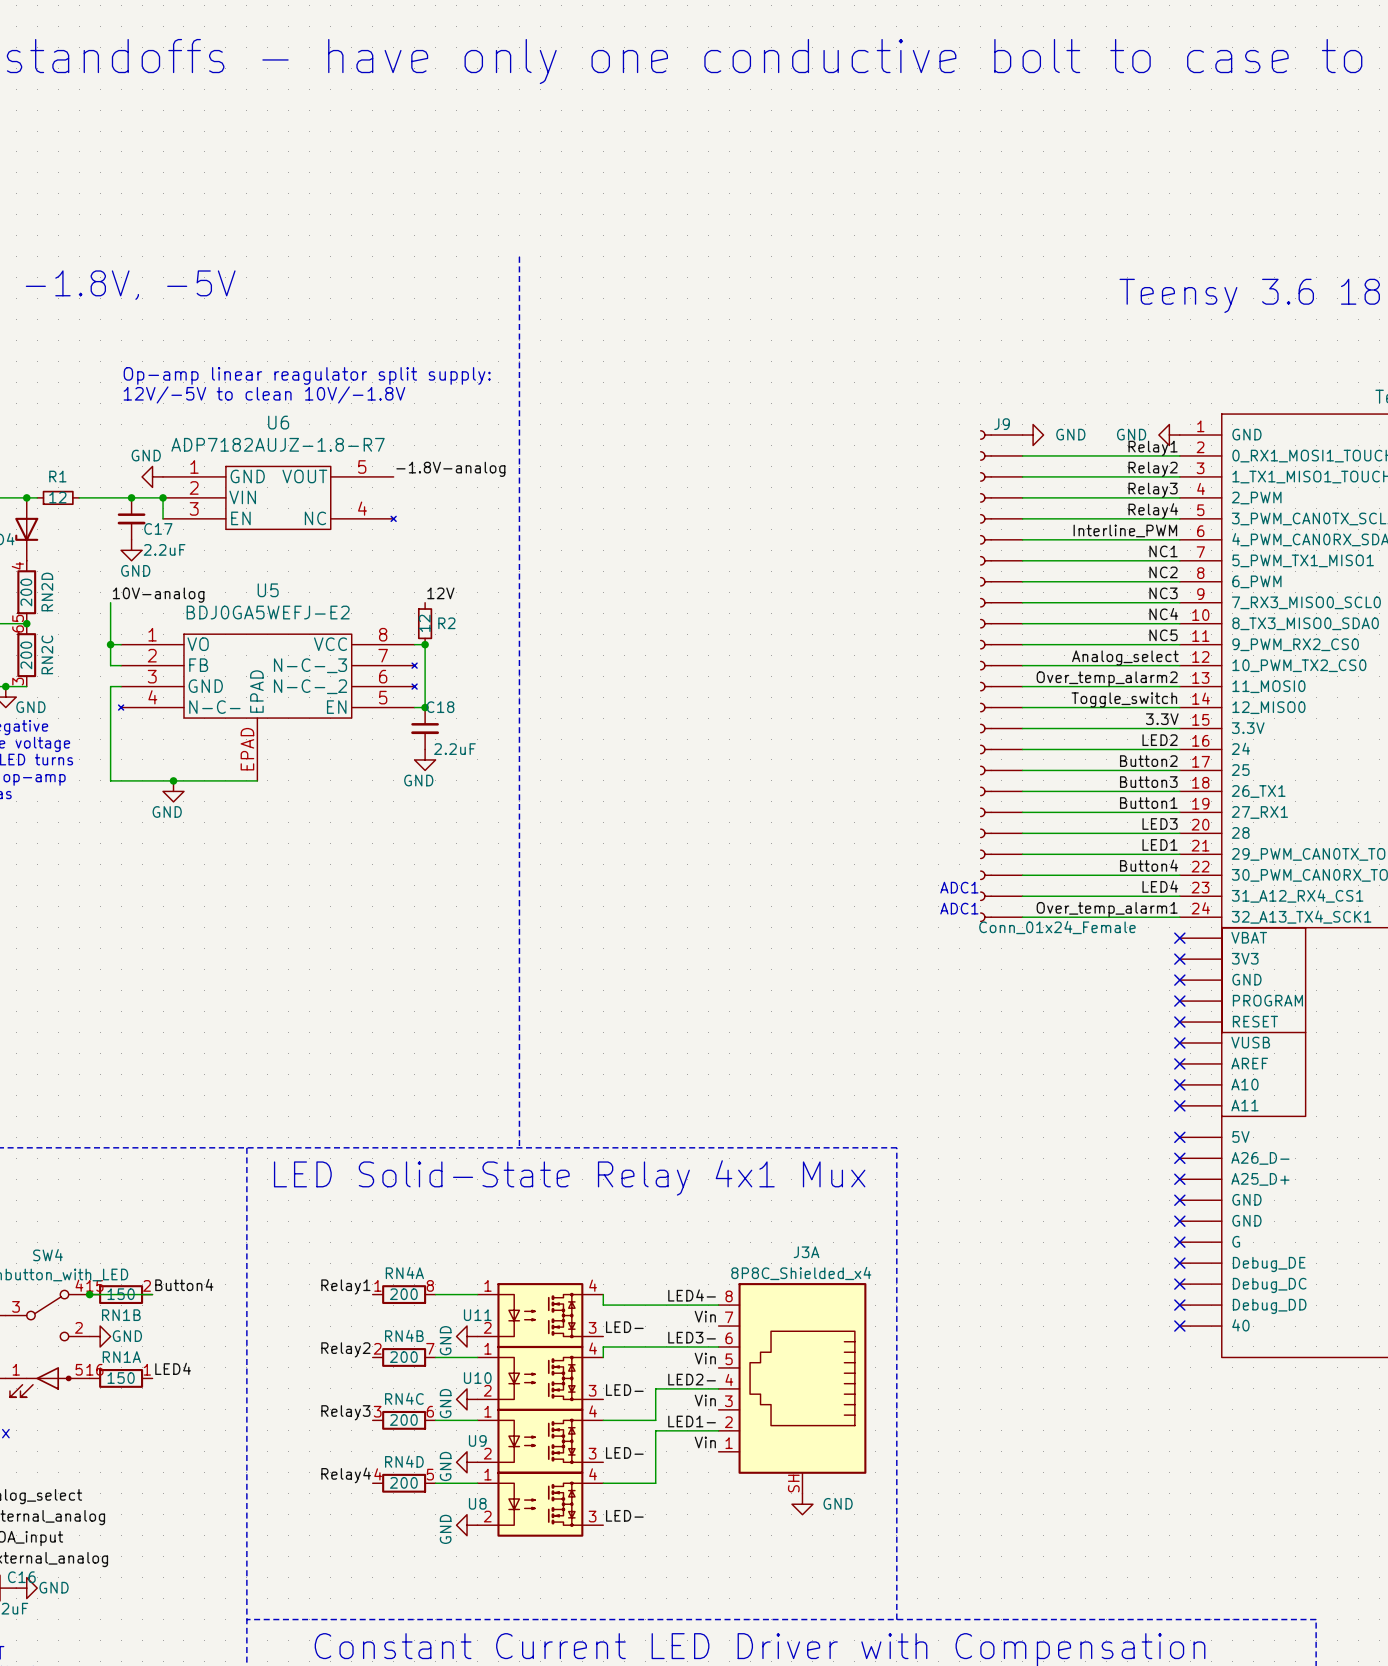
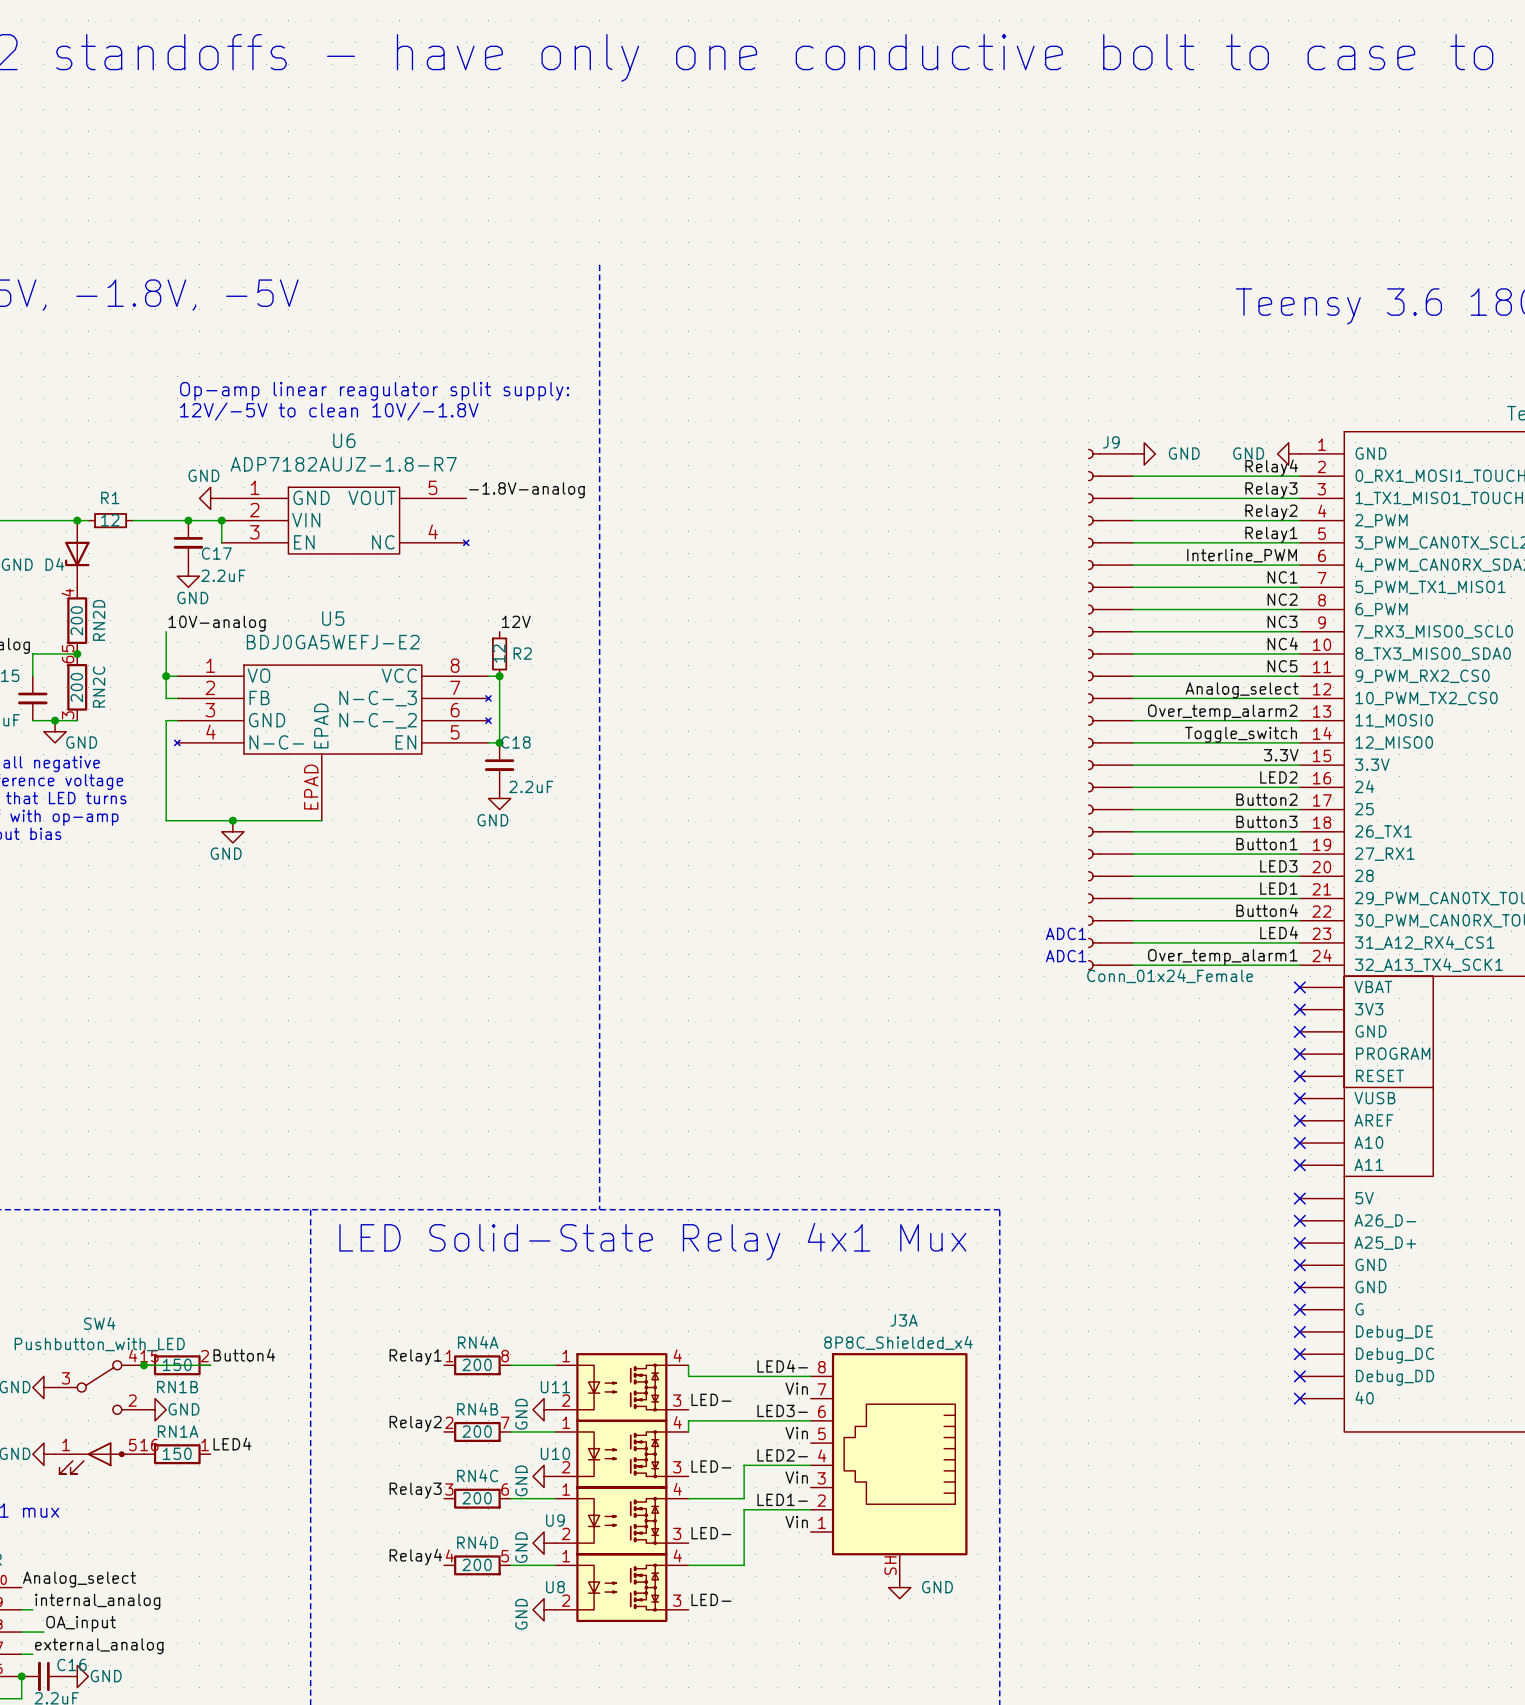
label: Relay1 (1153, 448) -> Relay4 (1271, 467)
label: Relay2 (1153, 469) -> Relay3 (1271, 490)
label: Relay3 (1153, 490) -> Relay2 (1271, 512)
label: Relay4 (1153, 511) -> Relay1 (1271, 534)

